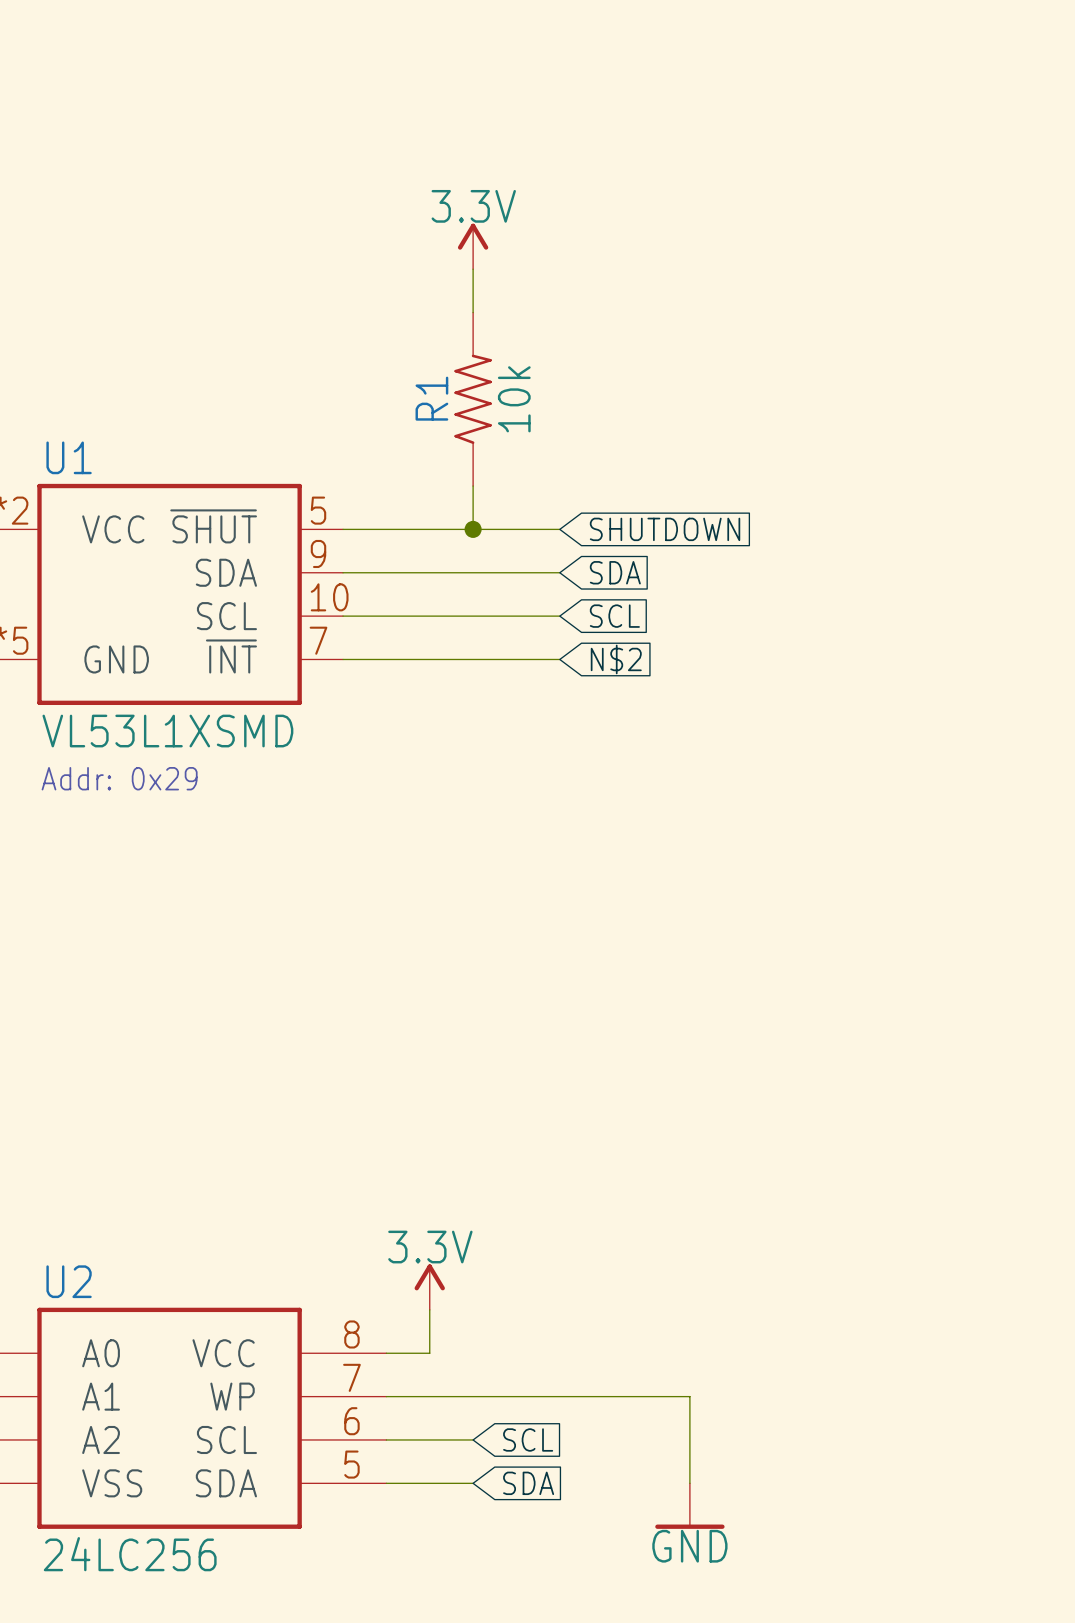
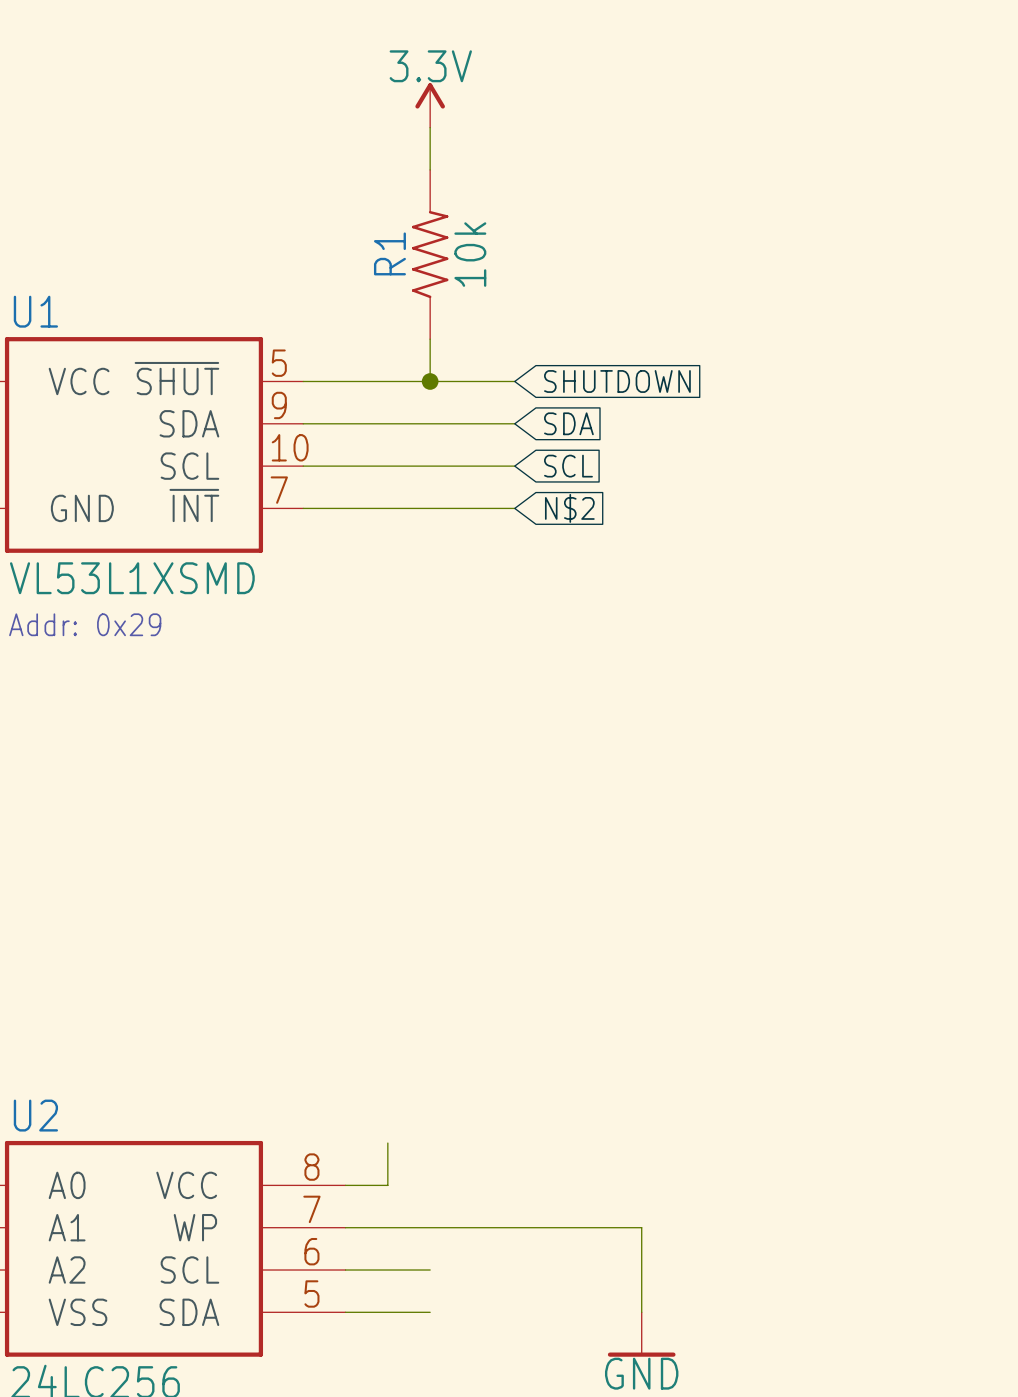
power symbol: 3.3V (429, 1287) -> none
global label: SCL (528, 1439) -> none
global label: SDA (528, 1483) -> none

